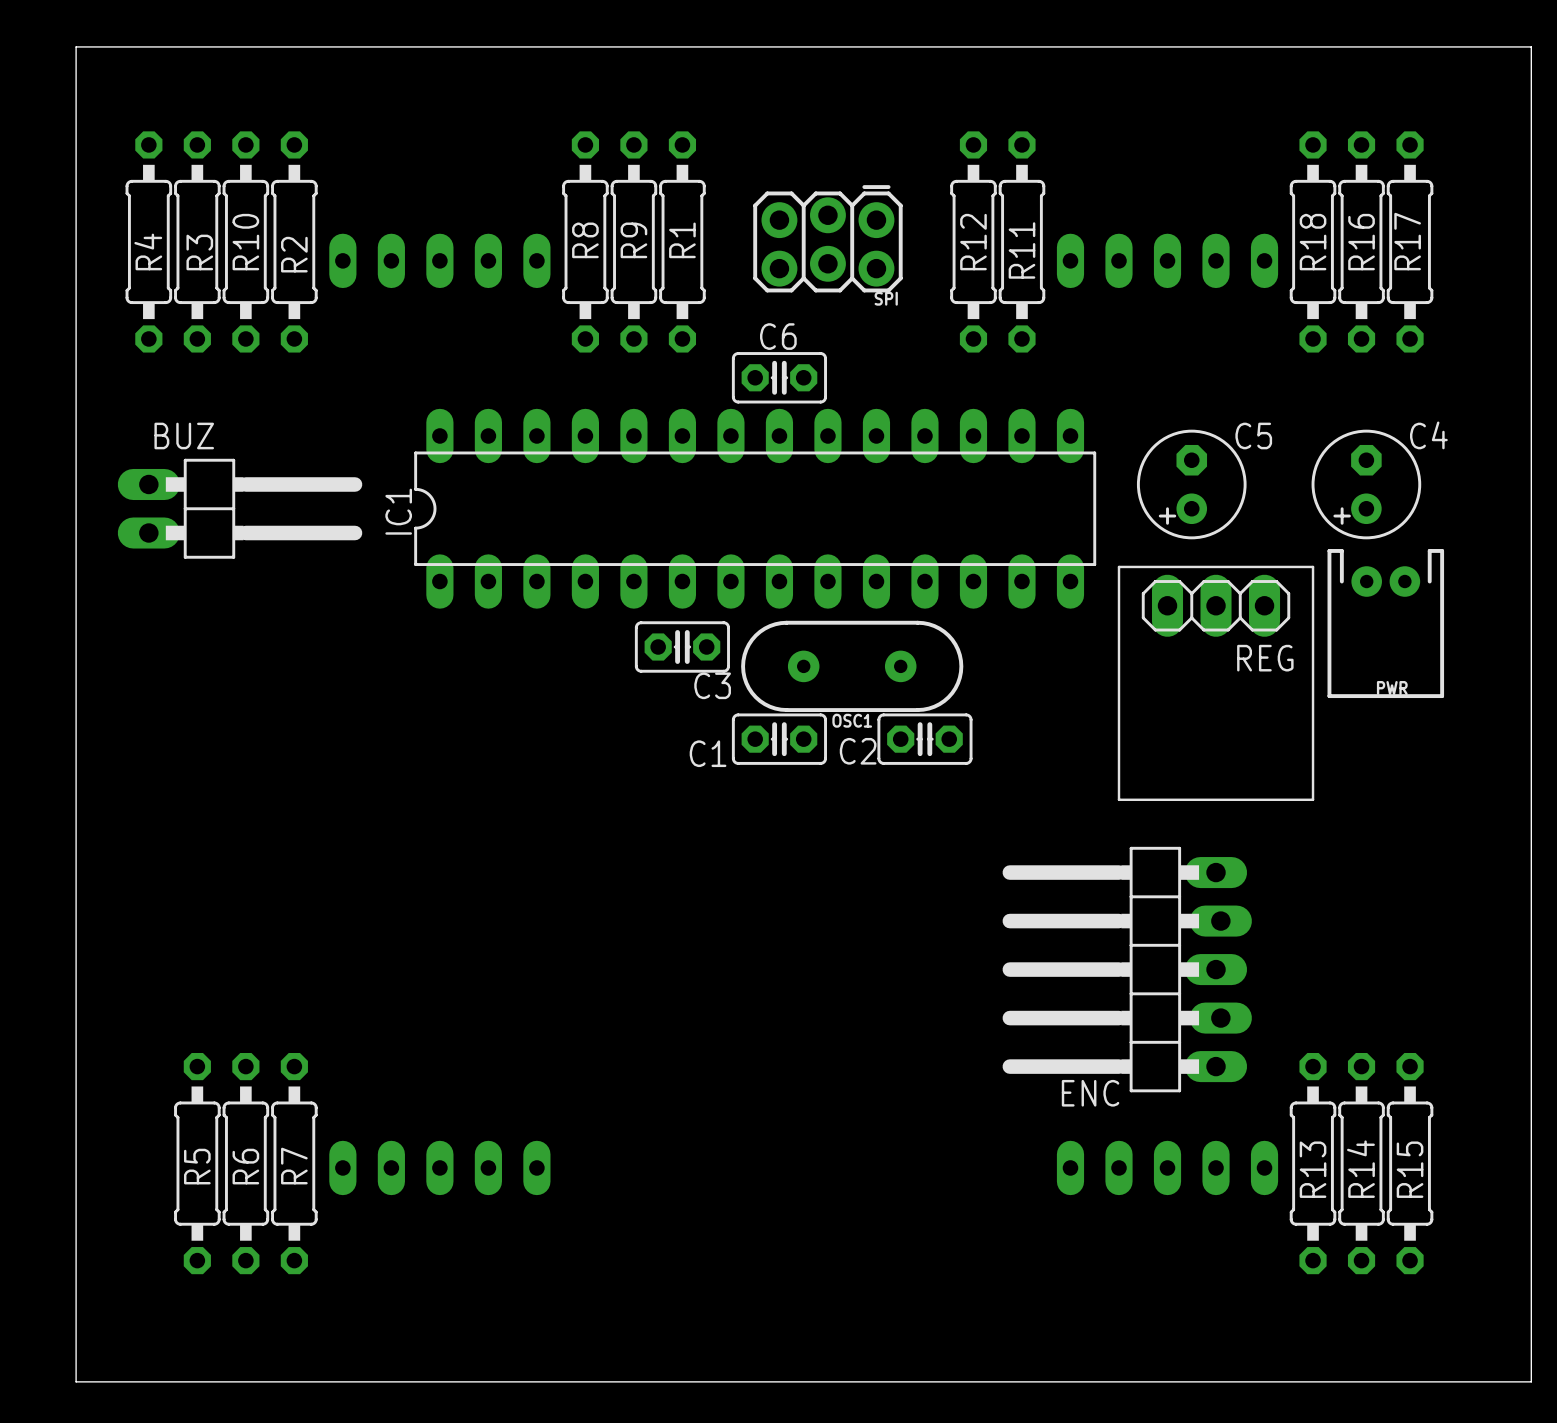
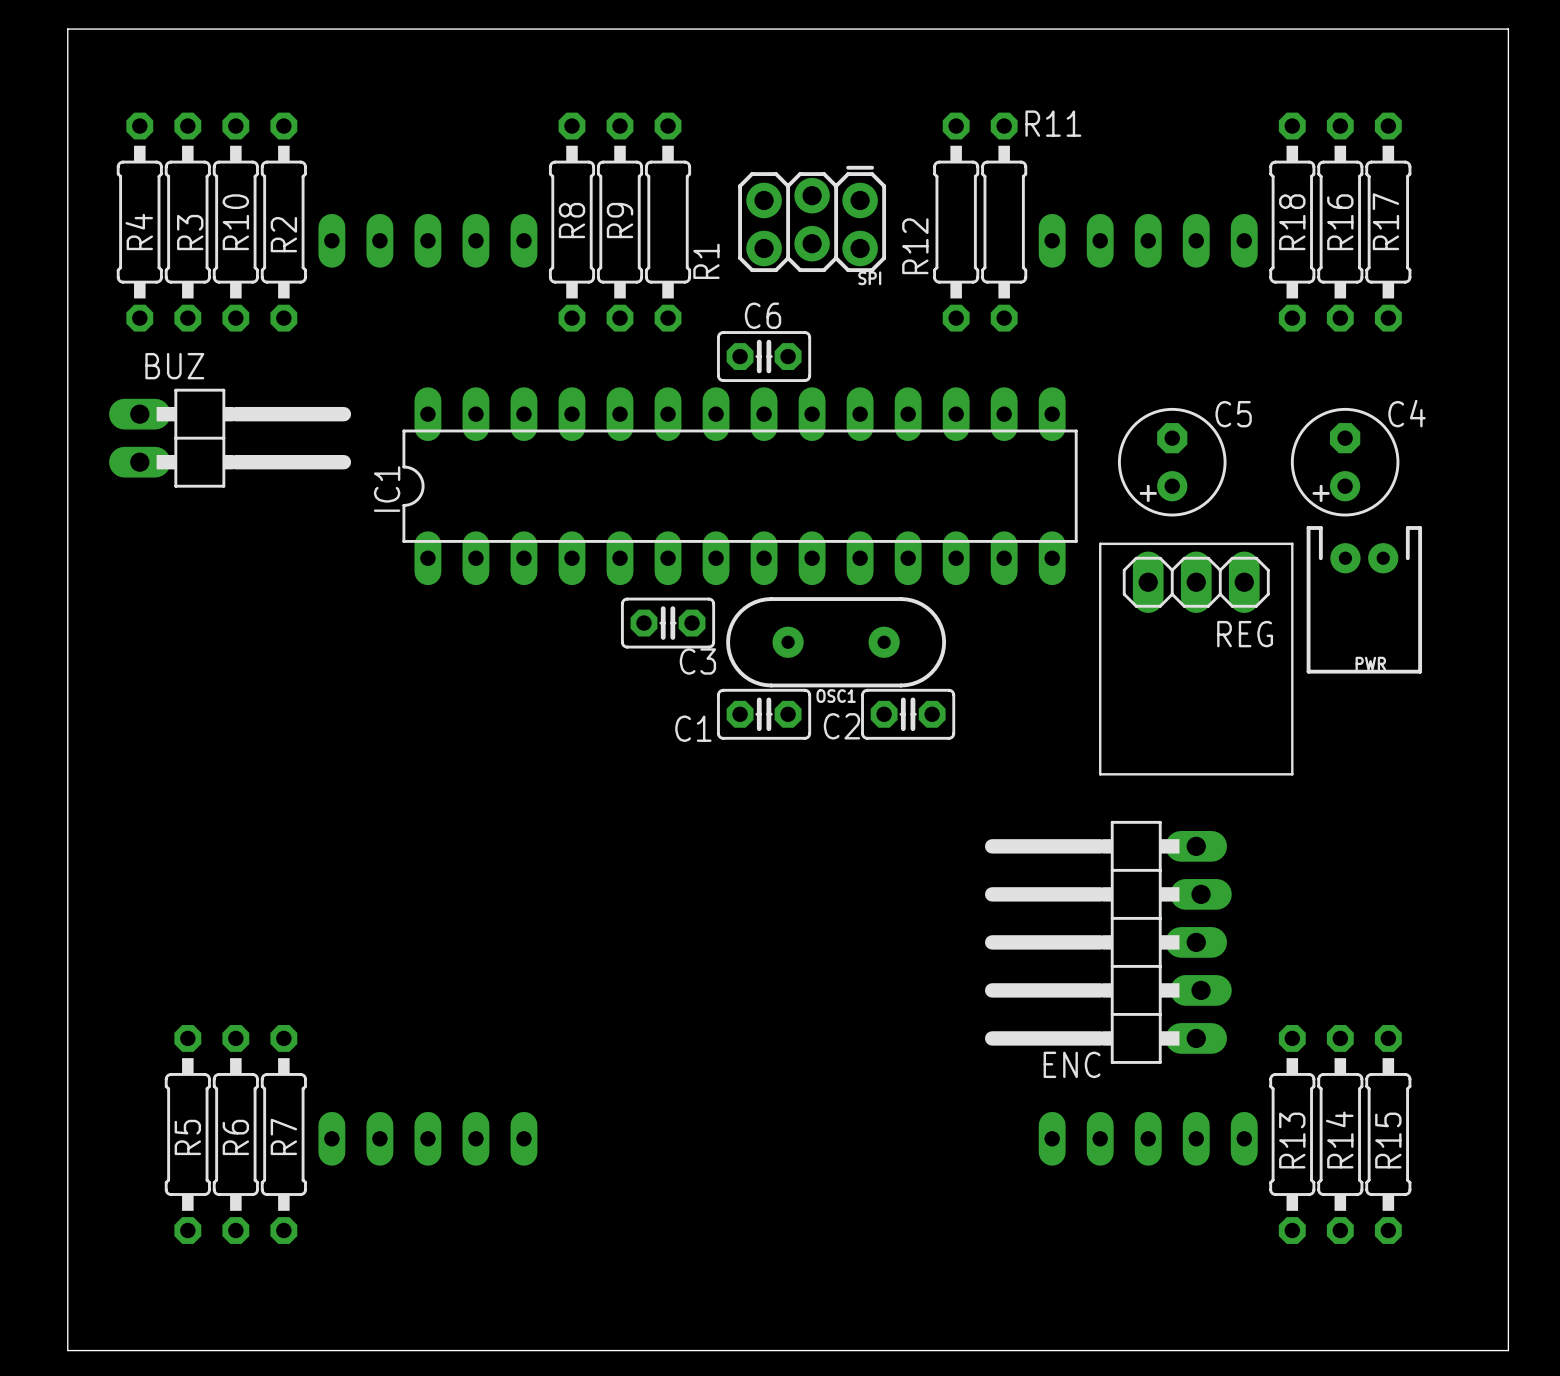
R1 name position: R1 (682, 240) -> R1 (706, 261)
R12 name position: R12 (973, 242) -> R12 (915, 246)
R11 name rotation: 0° (1021, 250) -> 90° clockwise (1053, 123)
R11 name position: R11 (1021, 250) -> R11 (1053, 123)
BUZ position: (240, 508) -> (230, 438)

